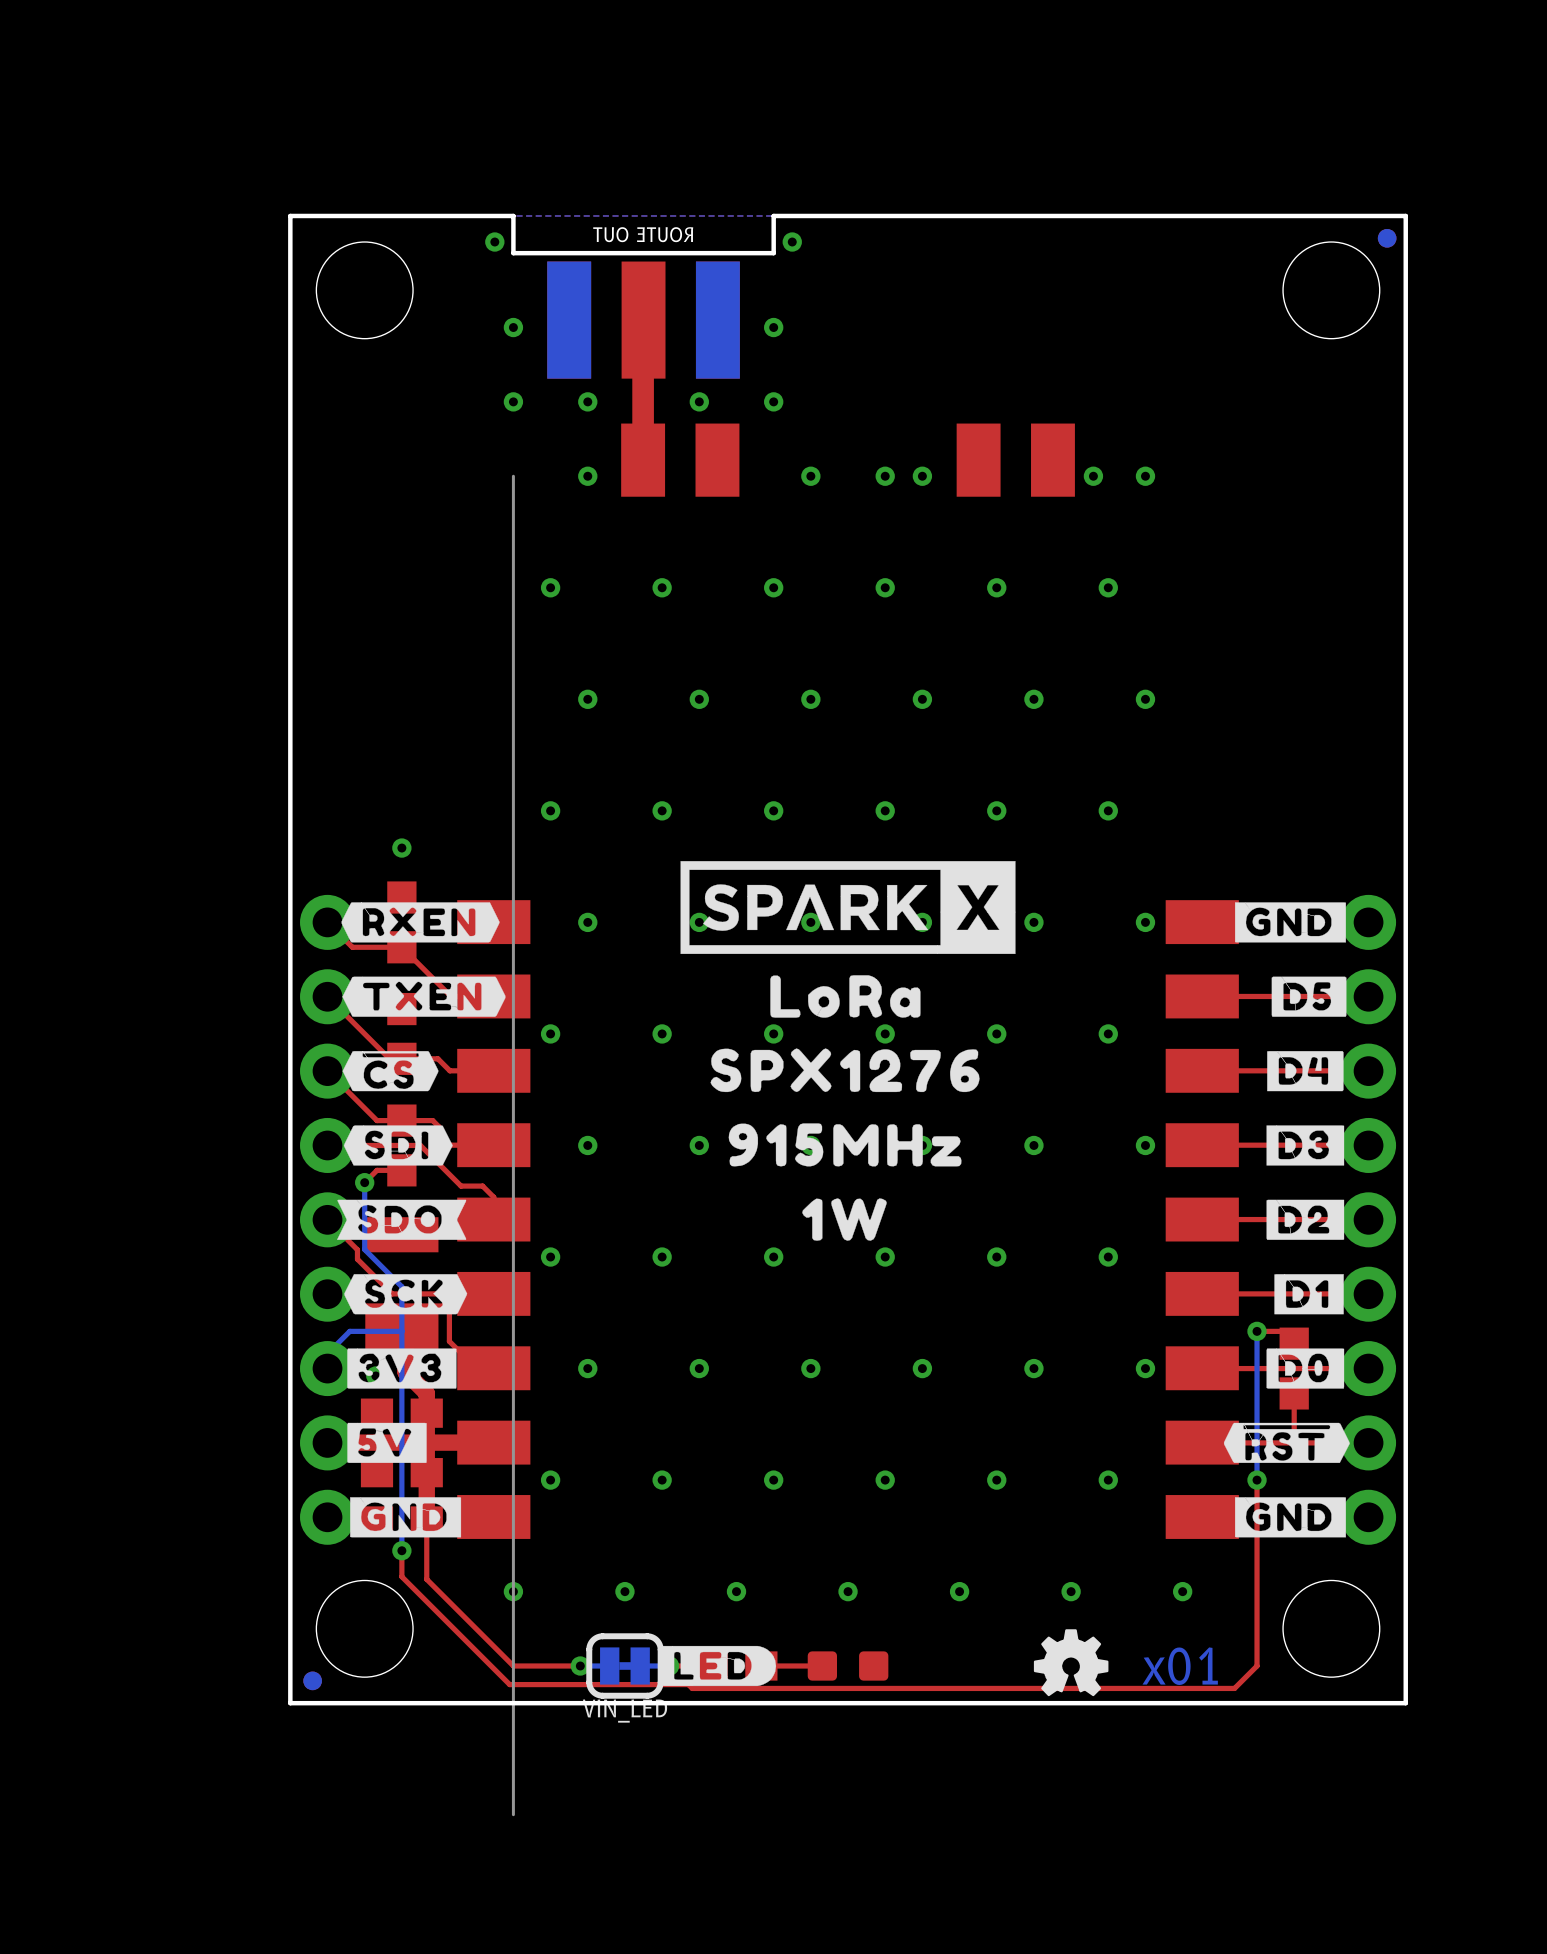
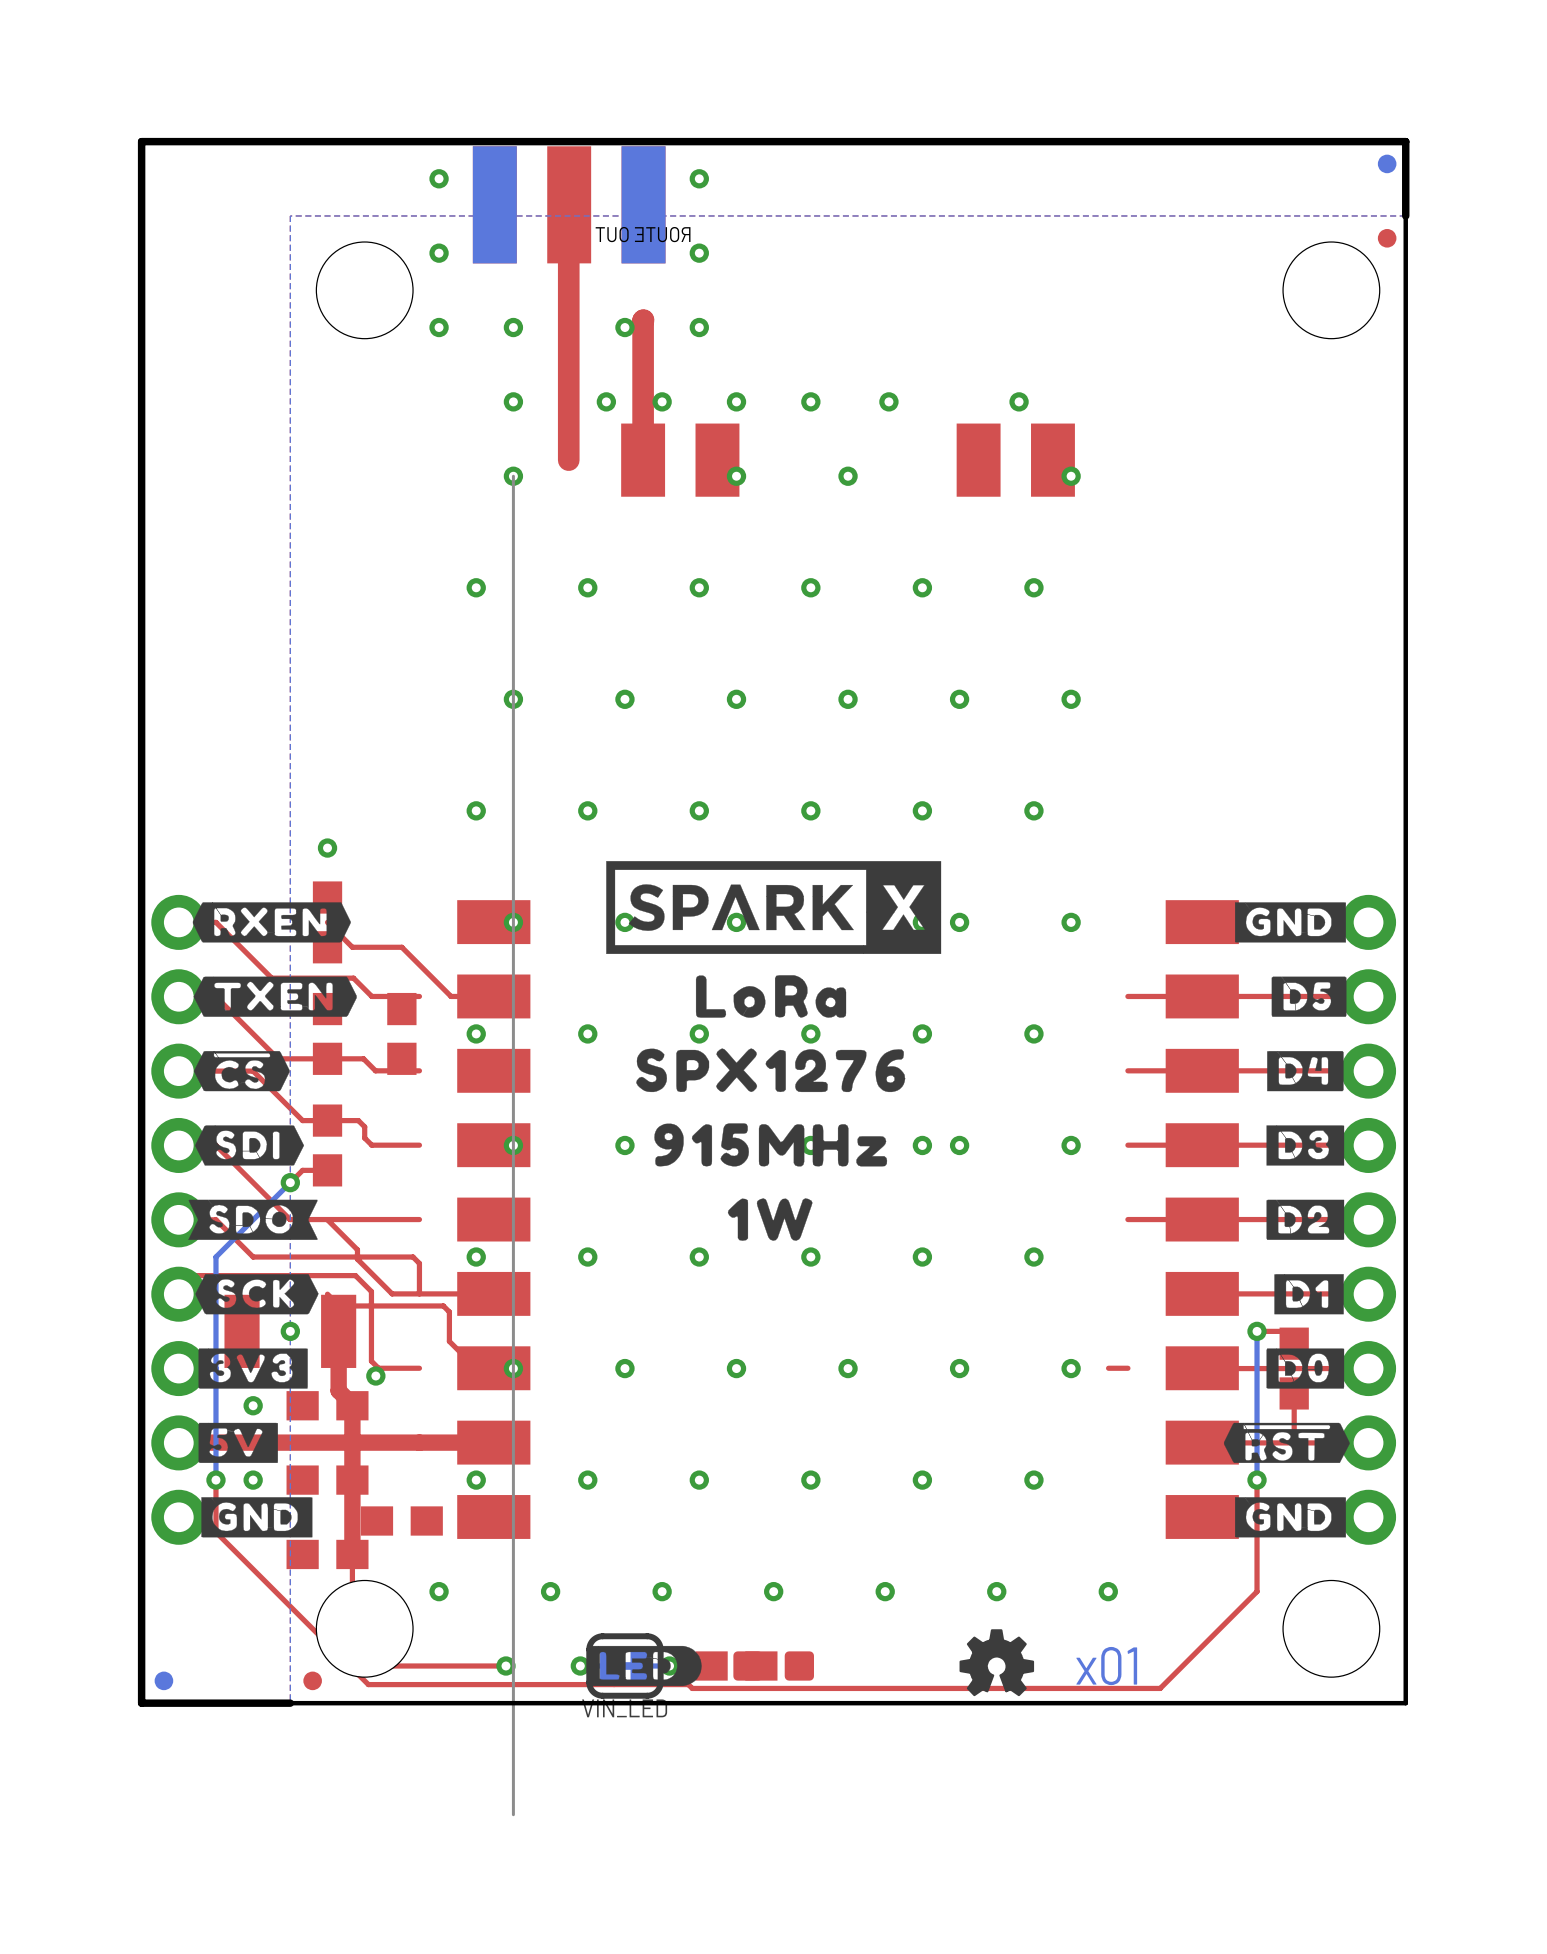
via: none -> (439, 178)
via: none -> (699, 178)
top track: none -> (569, 204) (568, 460)
board edge: (1405, 215) (773, 215) (773, 253) (513, 253) (513, 215) (290, 215) (290, 1703) -> (1405, 215) (1405, 141) (141, 141) (141, 1703) (290, 1703)
part position: (1387, 238) -> (1387, 163)
via: (494, 242) -> none
via: (792, 242) -> none
via: none -> (439, 253)
via: none -> (699, 253)
part position: (643, 320) -> (569, 204)
via: none -> (439, 327)
via: none -> (624, 327)
via: none -> (699, 327)
via: (773, 327) -> none
via position: (587, 401) -> (606, 401)
via: none -> (662, 401)
via: (699, 401) -> none
via: none -> (736, 401)
via: (773, 401) -> none
via: none -> (810, 401)
via: none -> (888, 401)
via: none -> (1019, 401)
via: none -> (513, 476)
via: (587, 476) -> none
via: none -> (736, 476)
via: (810, 476) -> none
via: none -> (848, 476)
via: (885, 476) -> none
via: (922, 476) -> none
via position: (1093, 476) -> (1071, 476)
via: (1145, 476) -> none
via: none -> (476, 587)
via: (550, 587) -> none
via: none -> (587, 587)
via: (662, 587) -> none
via: none -> (699, 587)
via: (773, 587) -> none
via: none -> (810, 587)
via: (885, 587) -> none
via: none -> (922, 587)
via: (996, 587) -> none
via: none -> (1033, 587)
via: (1108, 587) -> none
via: none -> (513, 699)
via: (587, 699) -> none
via: none -> (624, 699)
via: (699, 699) -> none
via: none -> (736, 699)
via: (810, 699) -> none
via: none -> (848, 699)
via: (922, 699) -> none
via: none -> (959, 699)
via: (1033, 699) -> none
via: none -> (1071, 699)
via: (1145, 699) -> none
via: none -> (476, 810)
via: (550, 810) -> none
via: none -> (587, 810)
via: (662, 810) -> none
via: none -> (699, 810)
via: (773, 810) -> none
via: none -> (810, 810)
via: (885, 810) -> none
via: none -> (922, 810)
via: (996, 810) -> none
via: none -> (1033, 810)
via: (1108, 810) -> none
via: none -> (327, 848)
via: (401, 848) -> none
drawing position: (848, 907) -> (773, 907)
top track: none -> (178, 922) (215, 922) (271, 978) (353, 978) (371, 996) (419, 996)
part: none -> (327, 922)
part: (401, 922) -> none
drawing position: (420, 922) -> (271, 922)
via: none -> (513, 922)
via: (587, 922) -> none
via: none -> (624, 922)
via: (699, 922) -> none
via: none -> (736, 922)
via: (810, 922) -> none
via: none -> (959, 922)
via: (1033, 922) -> none
via: none -> (1071, 922)
via: (1145, 922) -> none
top track: none -> (178, 996) (215, 996) (278, 1058) (363, 1058) (375, 1070) (419, 1070)
top track: (327, 996) (389, 1058) (437, 1058) (449, 1070) (493, 1070) -> none
drawing position: (423, 996) -> (275, 996)
drawing position: (845, 996) -> (771, 996)
top track: none -> (1202, 996) (1127, 996)
part: none -> (327, 1033)
via: none -> (476, 1033)
via: (550, 1033) -> none
via: none -> (587, 1033)
via: (662, 1033) -> none
via: none -> (699, 1033)
via: (773, 1033) -> none
via: none -> (810, 1033)
via: (885, 1033) -> none
via: none -> (922, 1033)
via: (996, 1033) -> none
via: none -> (1033, 1033)
via: (1108, 1033) -> none
drawing position: (845, 1070) -> (770, 1070)
top track: none -> (1202, 1070) (1127, 1070)
top track: none -> (178, 1071) (253, 1071) (302, 1120) (358, 1120) (364, 1126) (364, 1138) (371, 1145) (419, 1145)
top track: (327, 1071) (376, 1120) (432, 1120) (439, 1126) (439, 1138) (446, 1145) (493, 1145) -> none
drawing position: (390, 1071) -> (241, 1071)
drawing position: (845, 1144) -> (770, 1144)
top track: none -> (178, 1145) (215, 1145) (290, 1219) (419, 1219)
top track: (327, 1145) (420, 1145) (461, 1186) (482, 1186) (493, 1197) (493, 1219) -> none
part: none -> (327, 1145)
drawing position: (398, 1145) -> (249, 1145)
part: (401, 1145) -> none
via: none -> (513, 1145)
via: (587, 1145) -> none
via: none -> (624, 1145)
via: (699, 1145) -> none
via: none -> (959, 1145)
via: (1033, 1145) -> none
via: none -> (1071, 1145)
via: (1145, 1145) -> none
top track: none -> (1202, 1145) (1127, 1145)
top track: (401, 1170) (376, 1170) (364, 1182) -> (327, 1170) (302, 1170) (290, 1182)
bottom track: none -> (290, 1182) (215, 1257) (215, 1480)
via: none -> (290, 1182)
bottom track: (364, 1182) (364, 1249) (401, 1286) (401, 1550) -> none
via: (364, 1182) -> none
top track: none -> (178, 1219) (215, 1219) (253, 1257) (413, 1257) (419, 1263) (419, 1293)
part position: (327, 1219) -> (178, 1219)
drawing position: (401, 1219) -> (252, 1219)
drawing position: (844, 1219) -> (770, 1219)
top track: none -> (1202, 1219) (1127, 1219)
via: none -> (476, 1257)
via: (550, 1257) -> none
via: none -> (587, 1257)
via: (662, 1257) -> none
via: none -> (699, 1257)
via: (773, 1257) -> none
via: none -> (810, 1257)
via: (885, 1257) -> none
via: none -> (922, 1257)
via: (996, 1257) -> none
via: none -> (1033, 1257)
via: (1108, 1257) -> none
part rotation: 0° (401, 1283) -> 90° clockwise (290, 1331)
part position: (401, 1283) -> (290, 1331)
top track: none -> (178, 1294) (197, 1275) (355, 1275) (371, 1291) (371, 1361) (378, 1368) (419, 1368)
drawing position: (405, 1294) -> (257, 1294)
via: none -> (290, 1331)
top track: none -> (338, 1331) (338, 1390) (352, 1404) (352, 1653) (364, 1666) (505, 1666)
top track: (401, 1331) (405, 1335) (405, 1372) (426, 1393) (426, 1579) (513, 1666) (580, 1666) -> none
bottom track: (401, 1331) (349, 1331) (327, 1353) (327, 1368) -> none
drawing position: (401, 1368) -> (253, 1368)
via: none -> (513, 1368)
via: (587, 1368) -> none
via: none -> (624, 1368)
via: (699, 1368) -> none
via: none -> (736, 1368)
via: (810, 1368) -> none
via: none -> (848, 1368)
via: (922, 1368) -> none
via: none -> (959, 1368)
via: (1033, 1368) -> none
via: none -> (1071, 1368)
top track: none -> (1127, 1368) (1108, 1368)
via: (1145, 1368) -> none
via: none -> (253, 1405)
part: none -> (327, 1405)
part: (401, 1413) -> none
top track: none -> (327, 1442) (179, 1442)
drawing position: (387, 1442) -> (238, 1442)
part: (401, 1472) -> none
via: none -> (215, 1480)
via: none -> (253, 1480)
part: none -> (327, 1480)
via: none -> (476, 1480)
via: (550, 1480) -> none
via: none -> (587, 1480)
via: (662, 1480) -> none
via: none -> (699, 1480)
via: (773, 1480) -> none
via: none -> (810, 1480)
via: (885, 1480) -> none
via: none -> (922, 1480)
via: (996, 1480) -> none
via: none -> (1033, 1480)
via: (1108, 1480) -> none
drawing position: (405, 1517) -> (256, 1517)
top track: (401, 1550) (401, 1576) (509, 1684) -> (215, 1480) (215, 1532) (368, 1684) (509, 1684)
via: (401, 1550) -> none
part: none -> (327, 1554)
via: none -> (439, 1591)
via: (513, 1591) -> none
via: none -> (550, 1591)
via: (624, 1591) -> none
via: none -> (662, 1591)
via: (736, 1591) -> none
via: none -> (773, 1591)
via: (848, 1591) -> none
via: none -> (885, 1591)
via: (959, 1591) -> none
via: none -> (996, 1591)
via: (1071, 1591) -> none
via: none -> (1108, 1591)
via: (1182, 1591) -> none
top track: (1257, 1591) (1257, 1666) (1234, 1688) (1160, 1688) -> (1257, 1591) (1160, 1688)
drawing position: (1071, 1662) -> (996, 1662)
via: none -> (505, 1666)
drawing position: (719, 1666) -> (644, 1666)
top track: (822, 1666) (761, 1666) -> none
part position: (848, 1666) -> (773, 1666)
text position: x01 (1180, 1666) -> x01 (1106, 1666)
part position: (312, 1680) -> (163, 1680)

